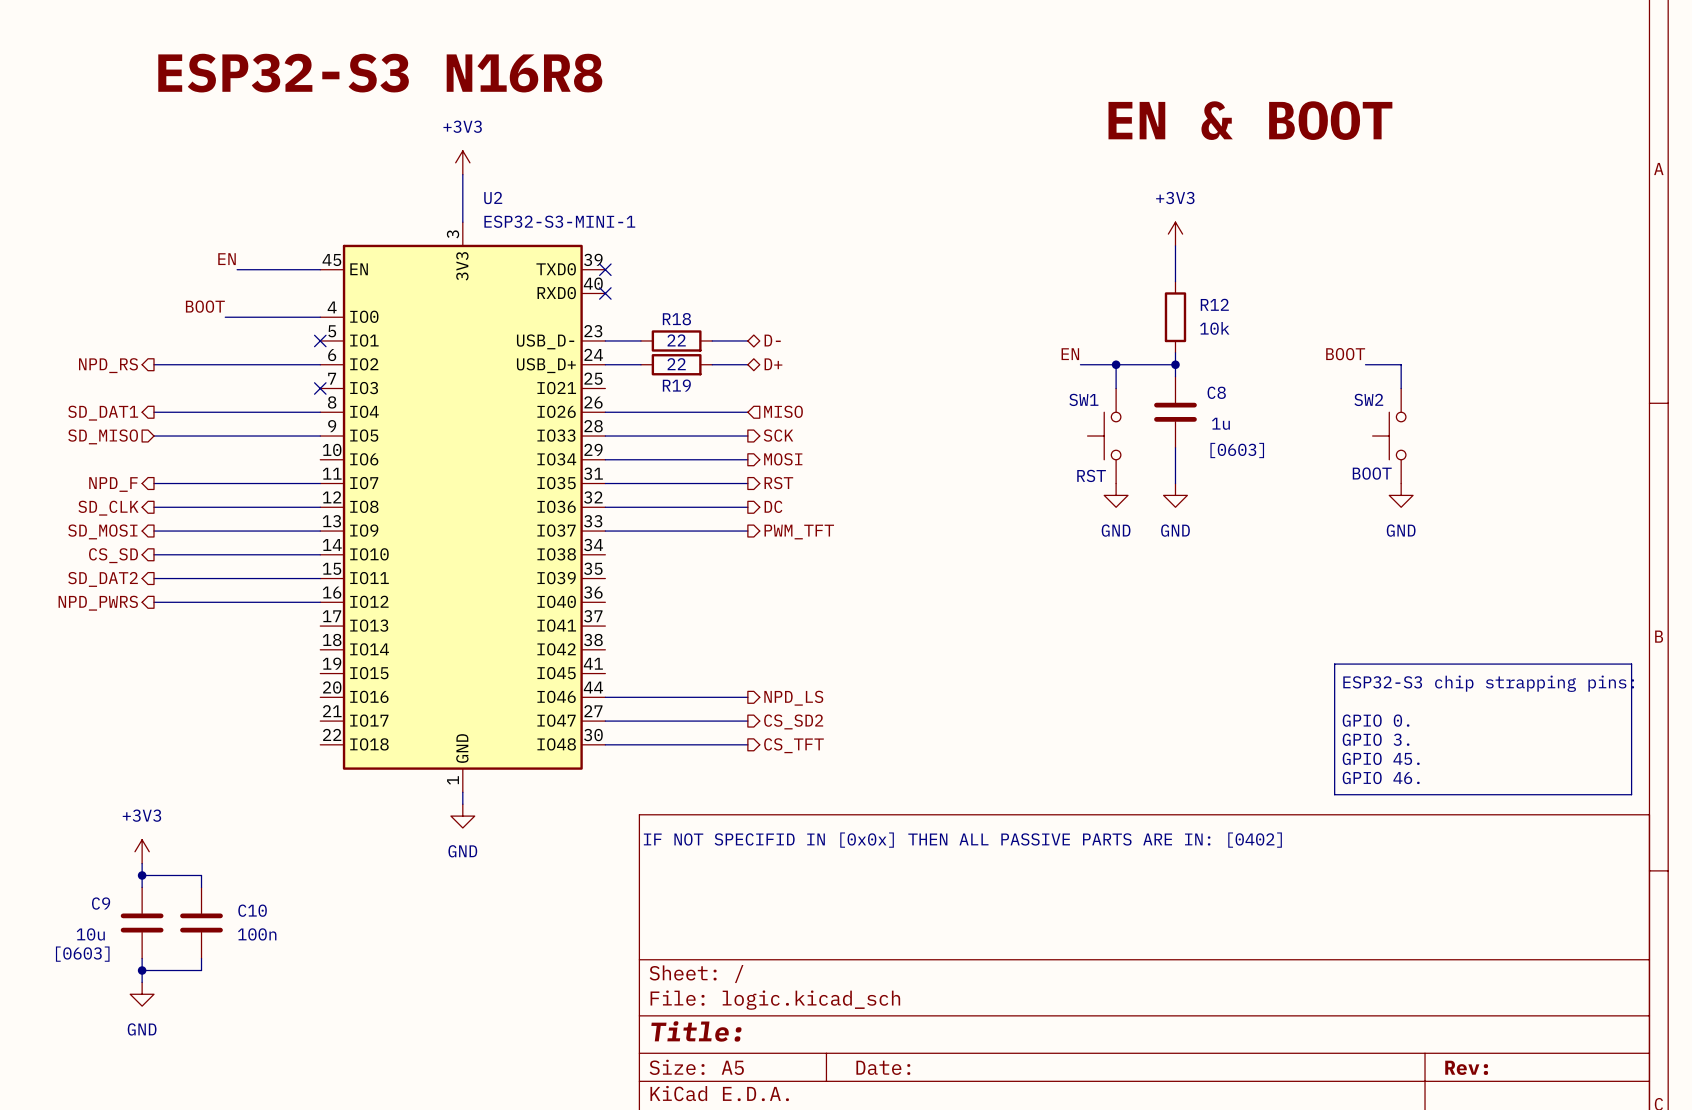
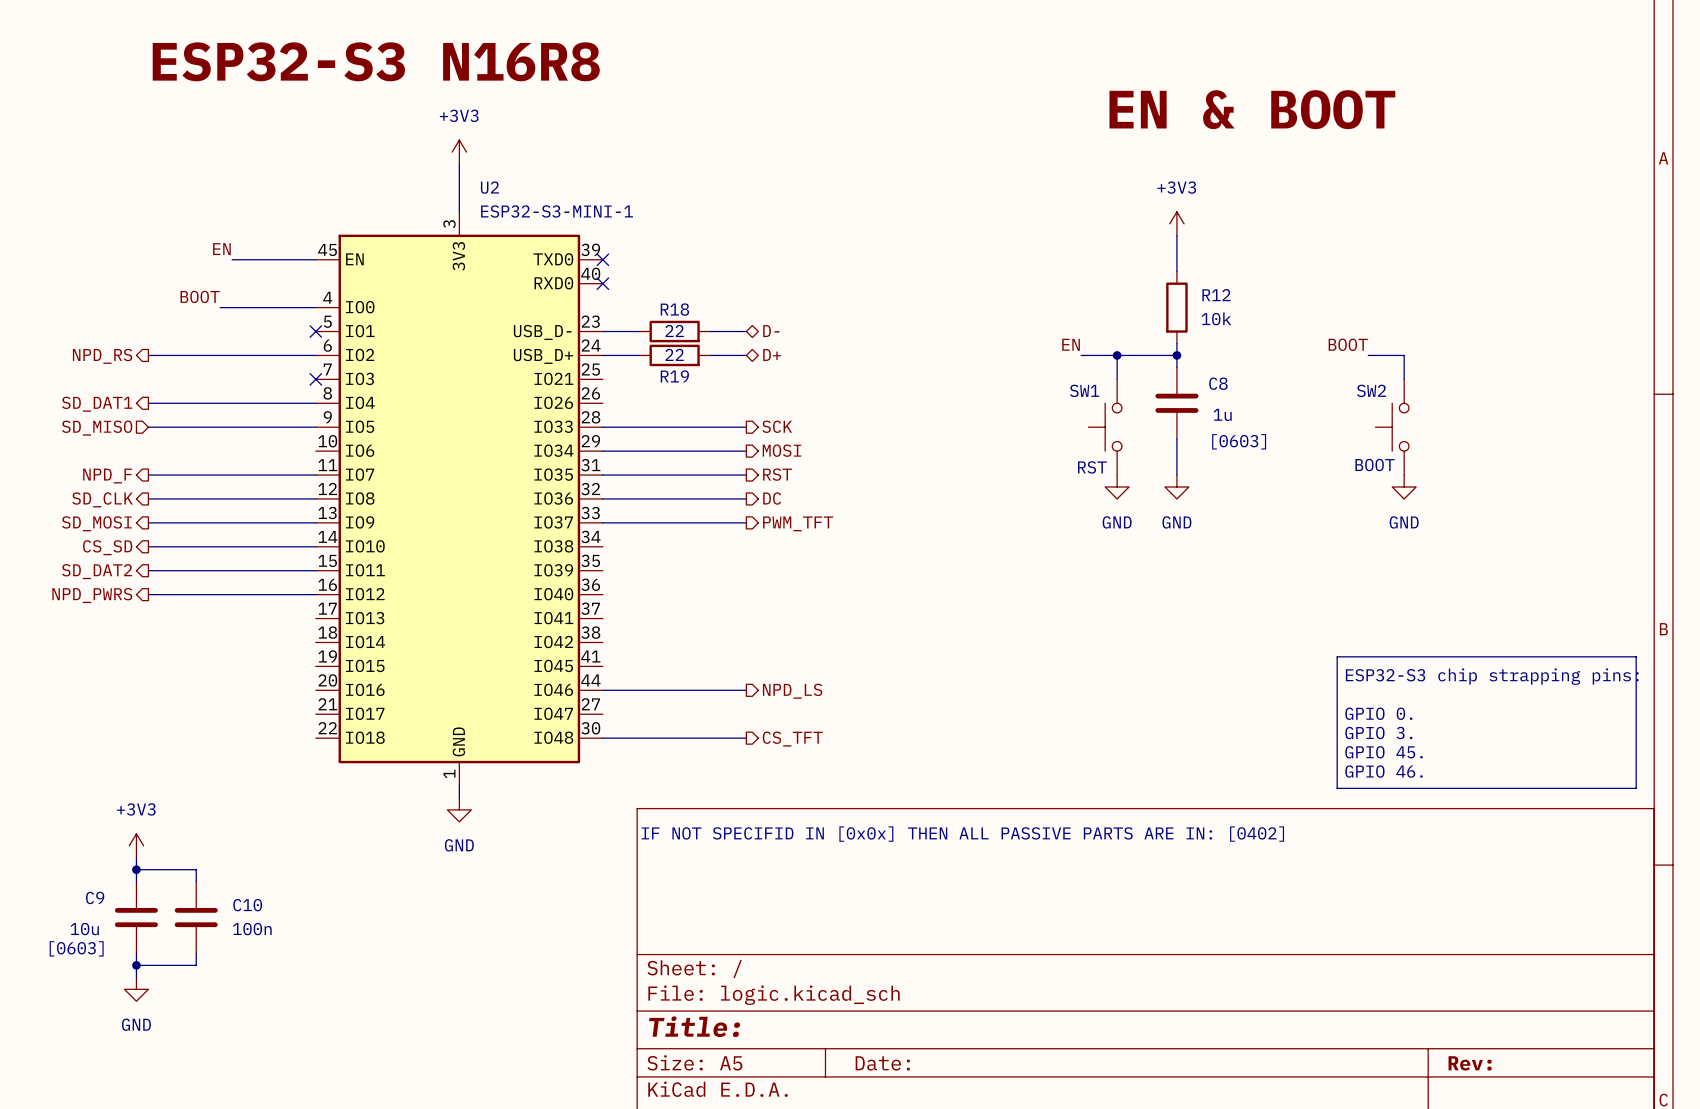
hierarchical label: MISO (783, 411) -> none
wire: (605, 412) (747, 412) -> none
wire: (605, 721) (747, 721) -> none
hierarchical label: CS_SD2 (793, 721) -> none

